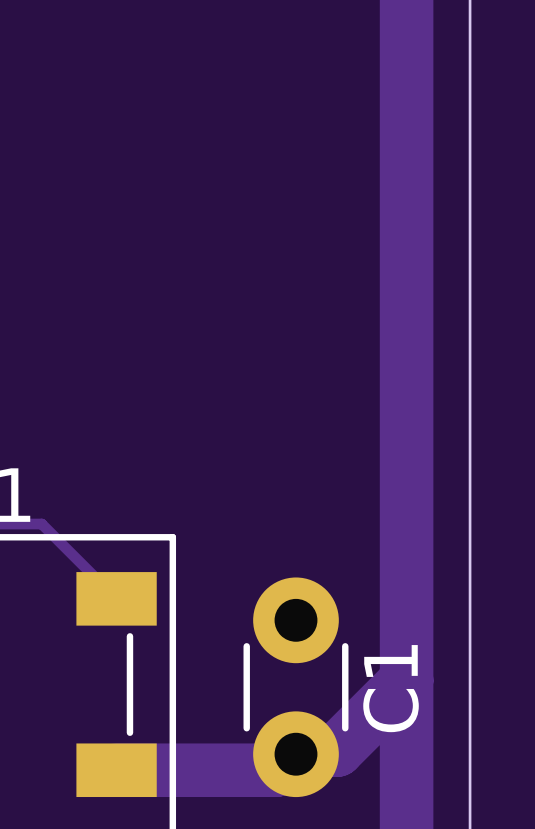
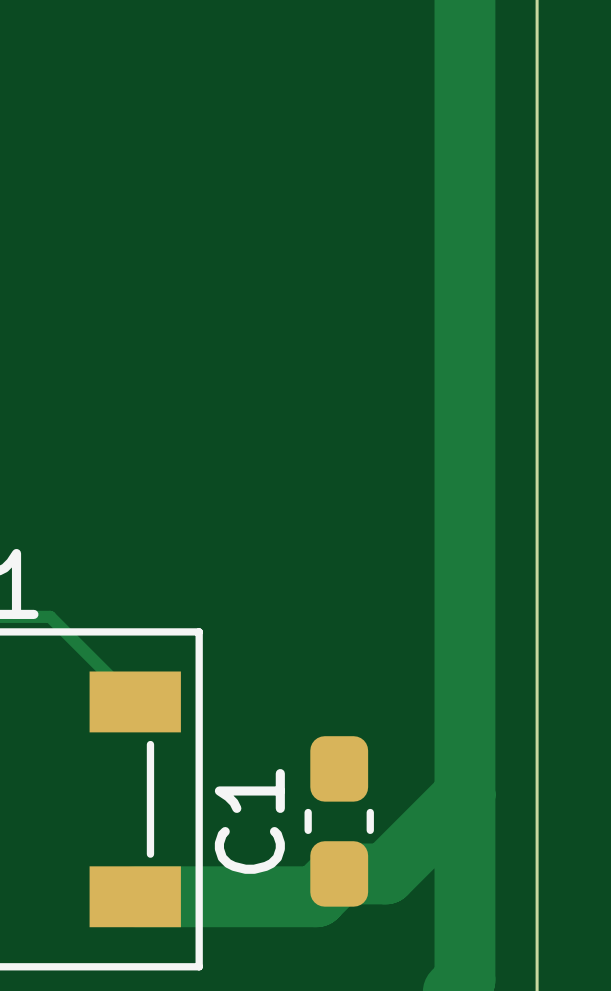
C1 footprint: [243, 577, 349, 798] -> [304, 736, 374, 907]
C1 name position: C1 (391, 688) -> C1 (249, 821)

